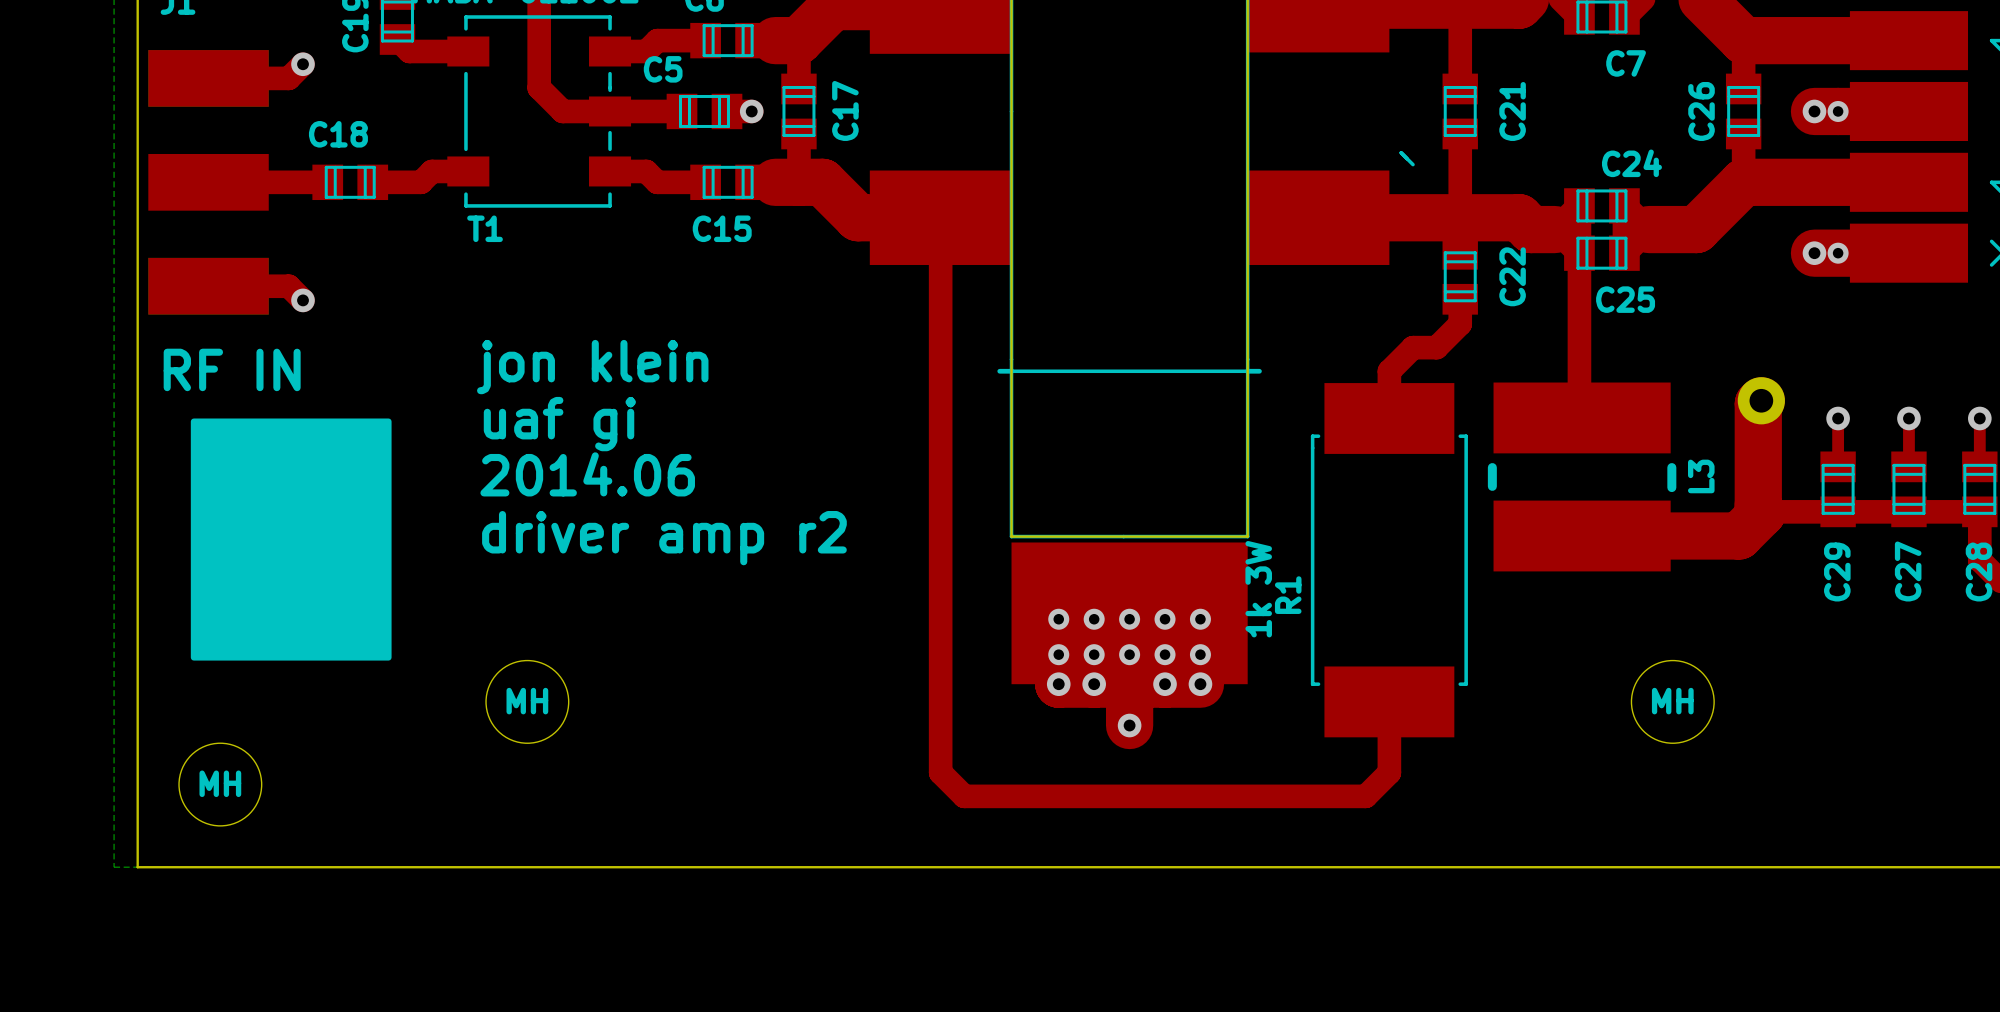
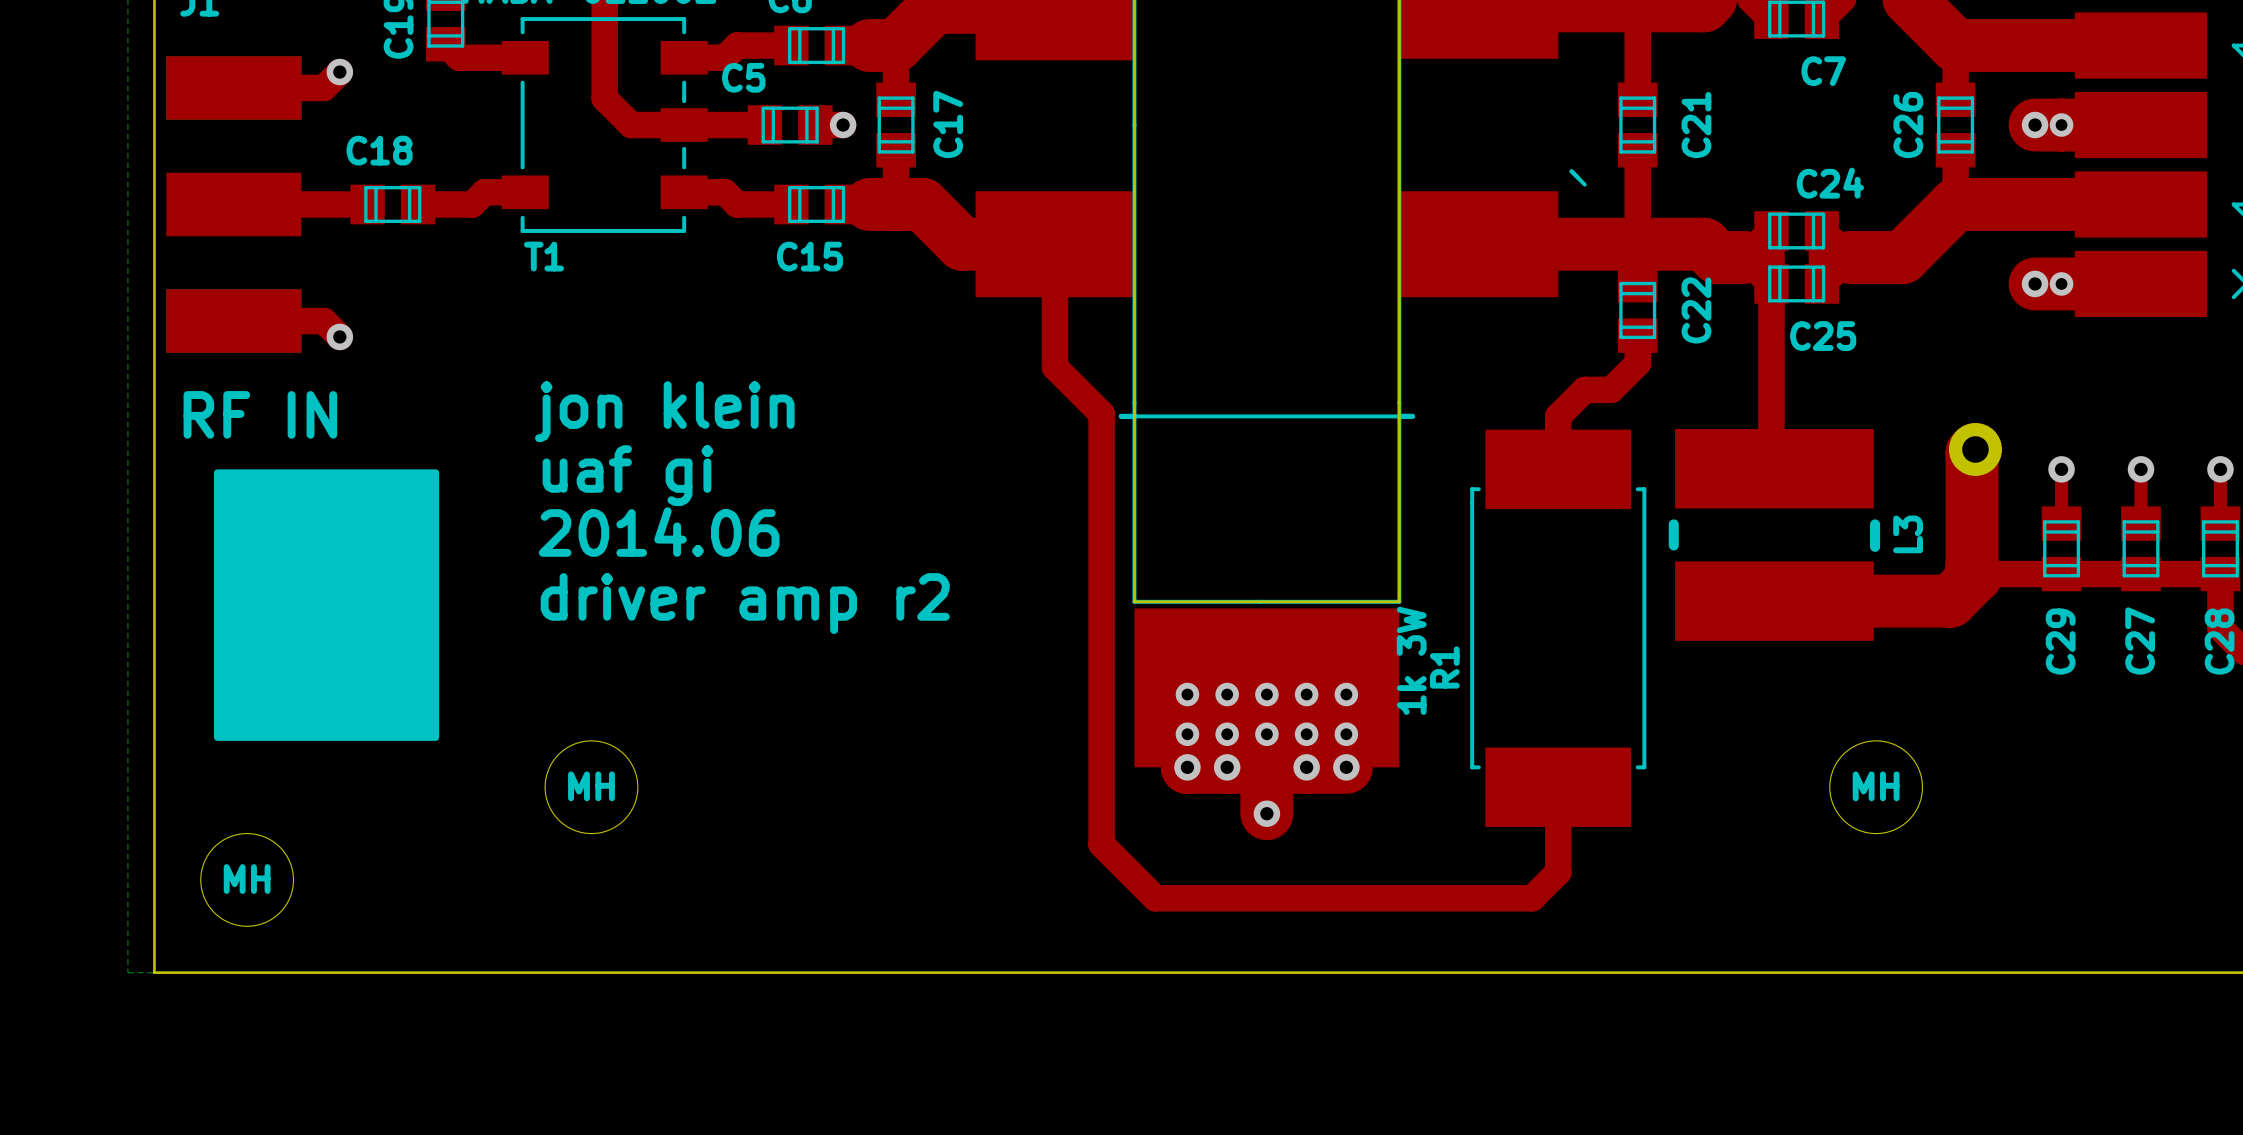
top track: (940, 327) (940, 772) (964, 796) (1365, 796) (1389, 772) -> (1055, 367) (1101, 413) (1101, 844) (1155, 898) (1532, 898) (1558, 872) (1558, 866)

